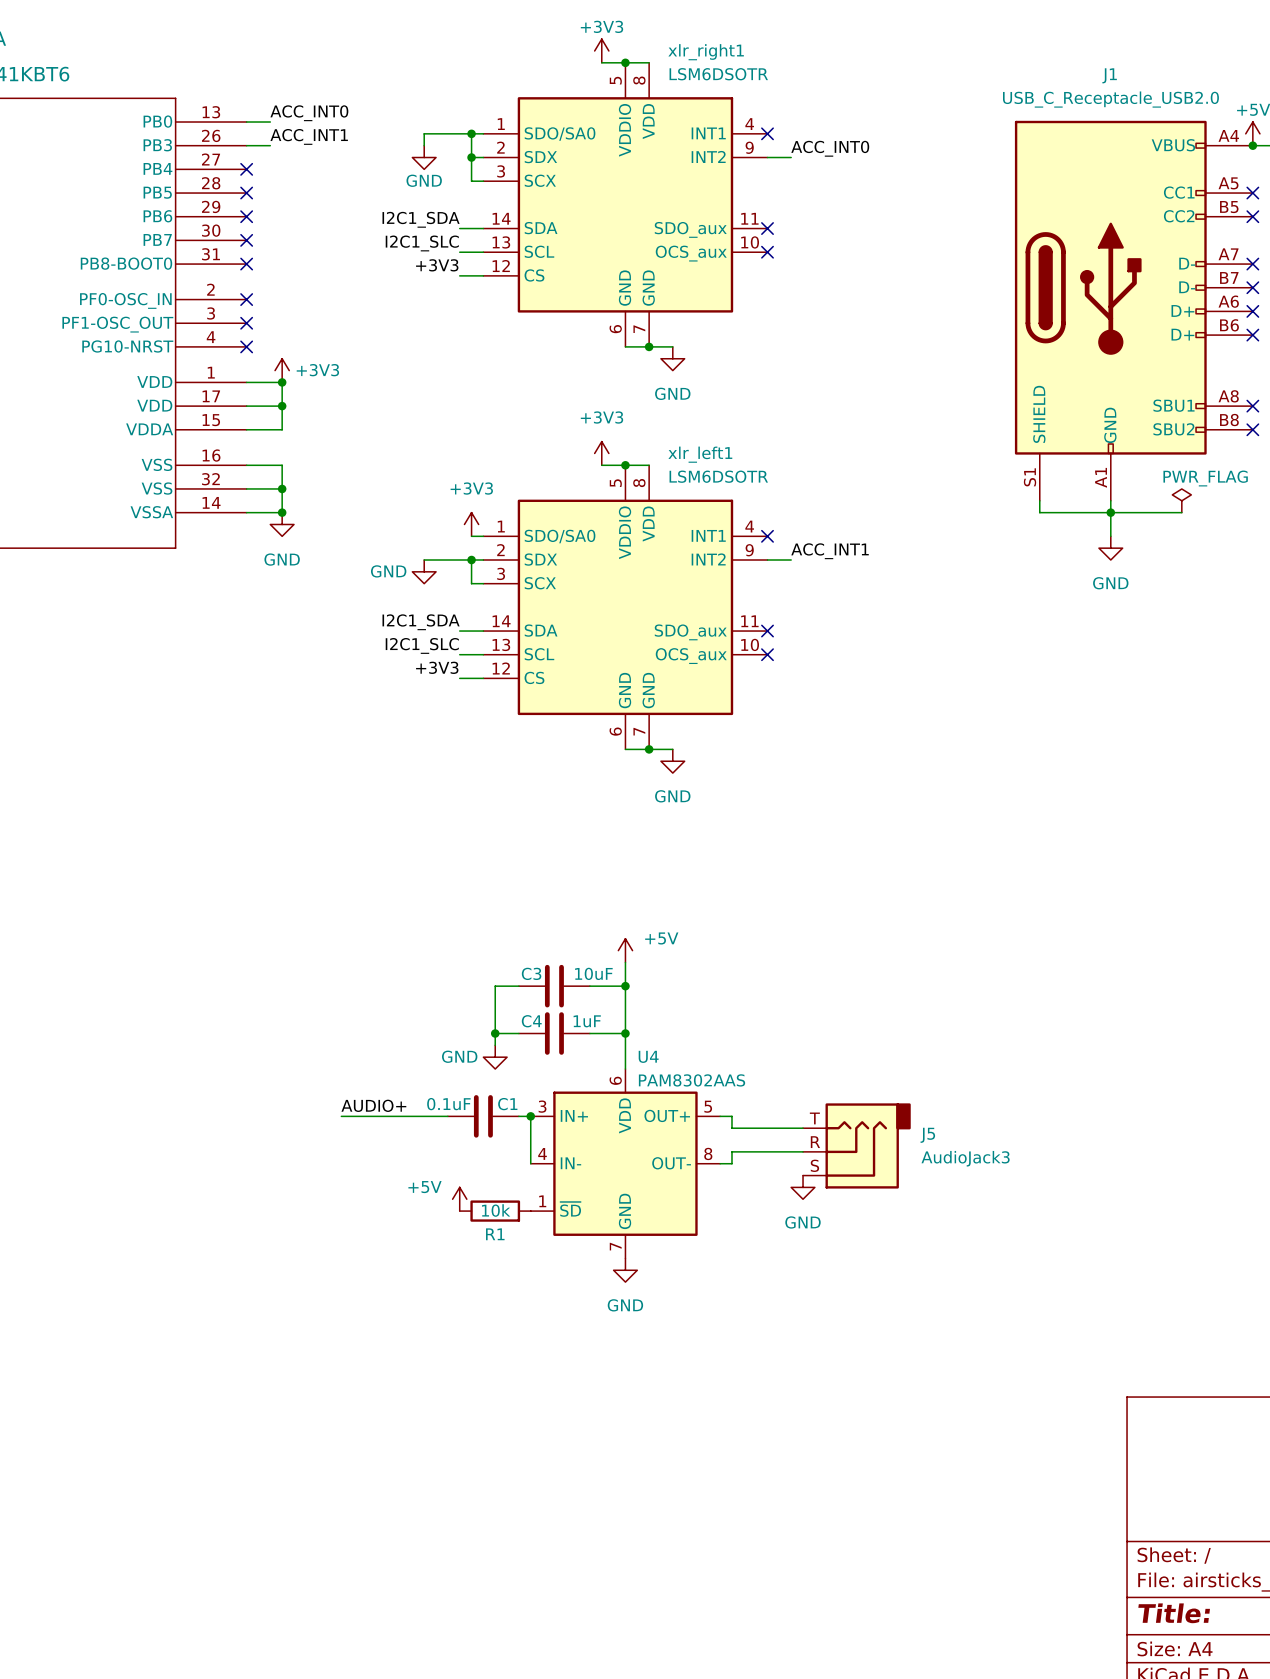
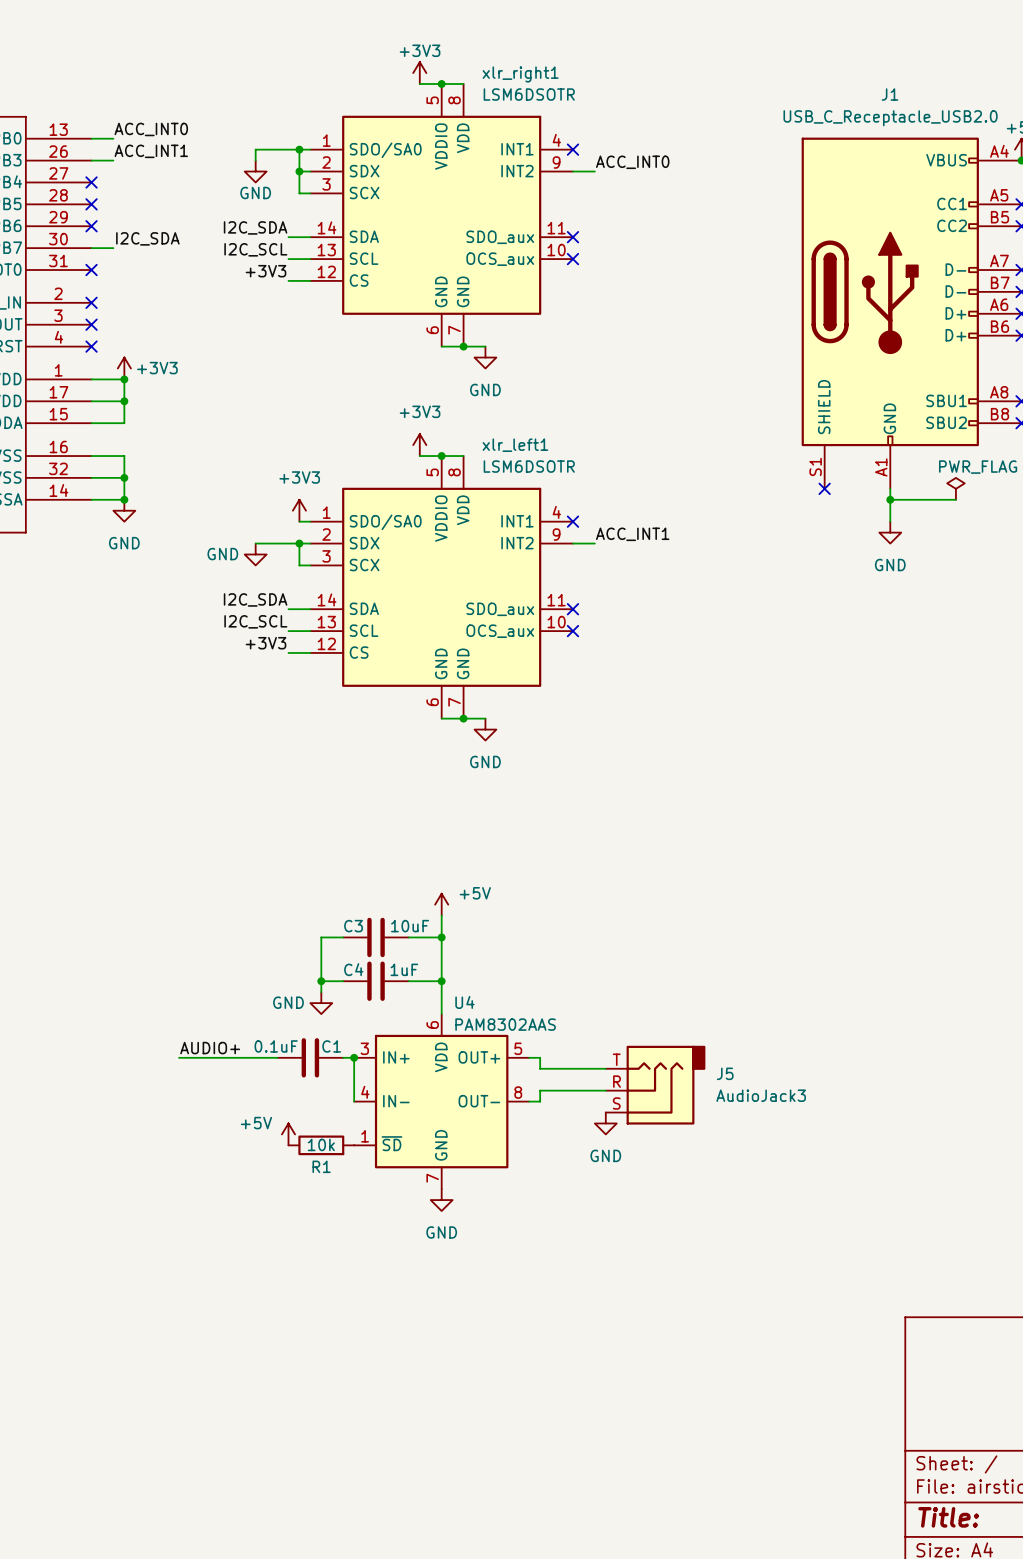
label: I2C1_SDA (421, 219) -> I2C_SDA (255, 227)
label: none -> I2C_SDA (147, 238)
wire: none -> (91, 248) (113, 248)
no-connect mark: (246, 240) -> none
label: I2C1_SLC (422, 243) -> I2C_SCL (255, 249)
wire: (1039, 500) (1039, 512) (1110, 512) -> none
no-connect mark: none -> (824, 488)
label: I2C1_SDA (421, 622) -> I2C_SDA (255, 599)
label: I2C1_SLC (422, 645) -> I2C_SCL (255, 621)

